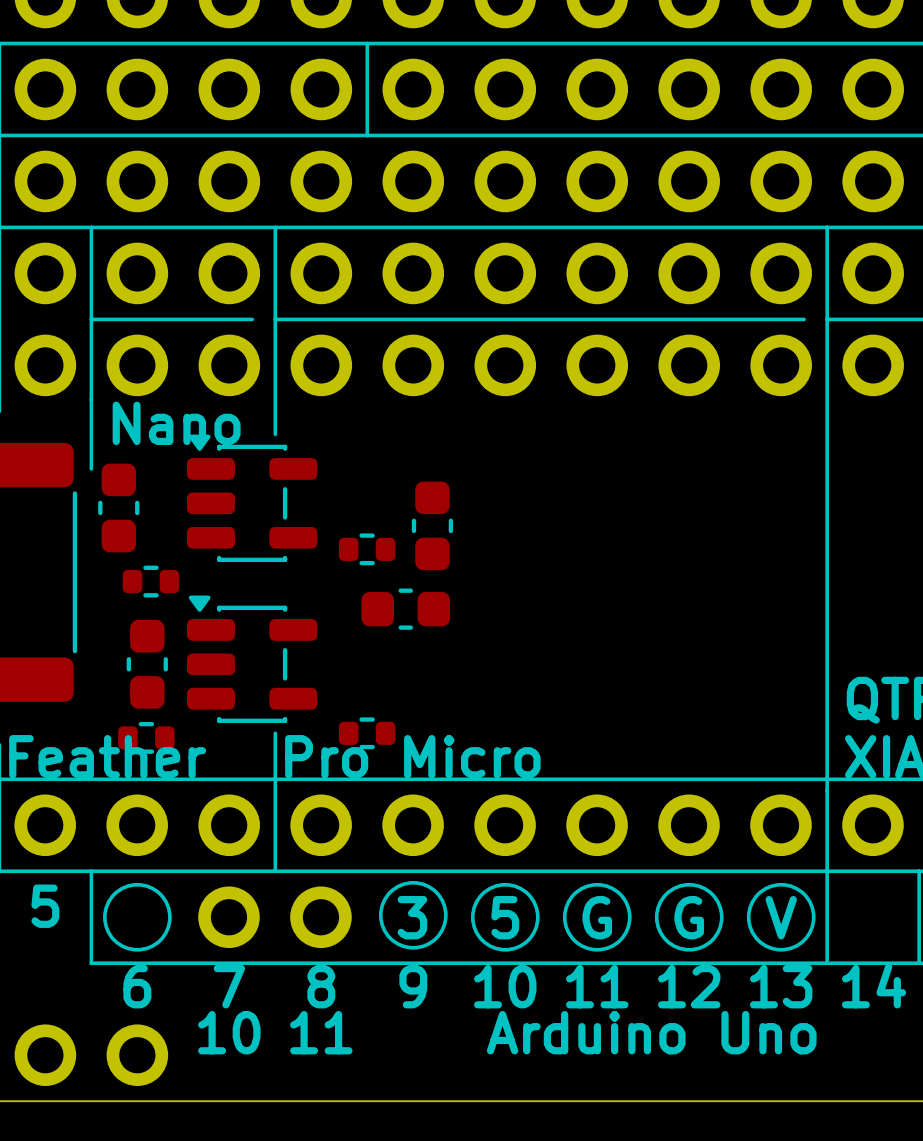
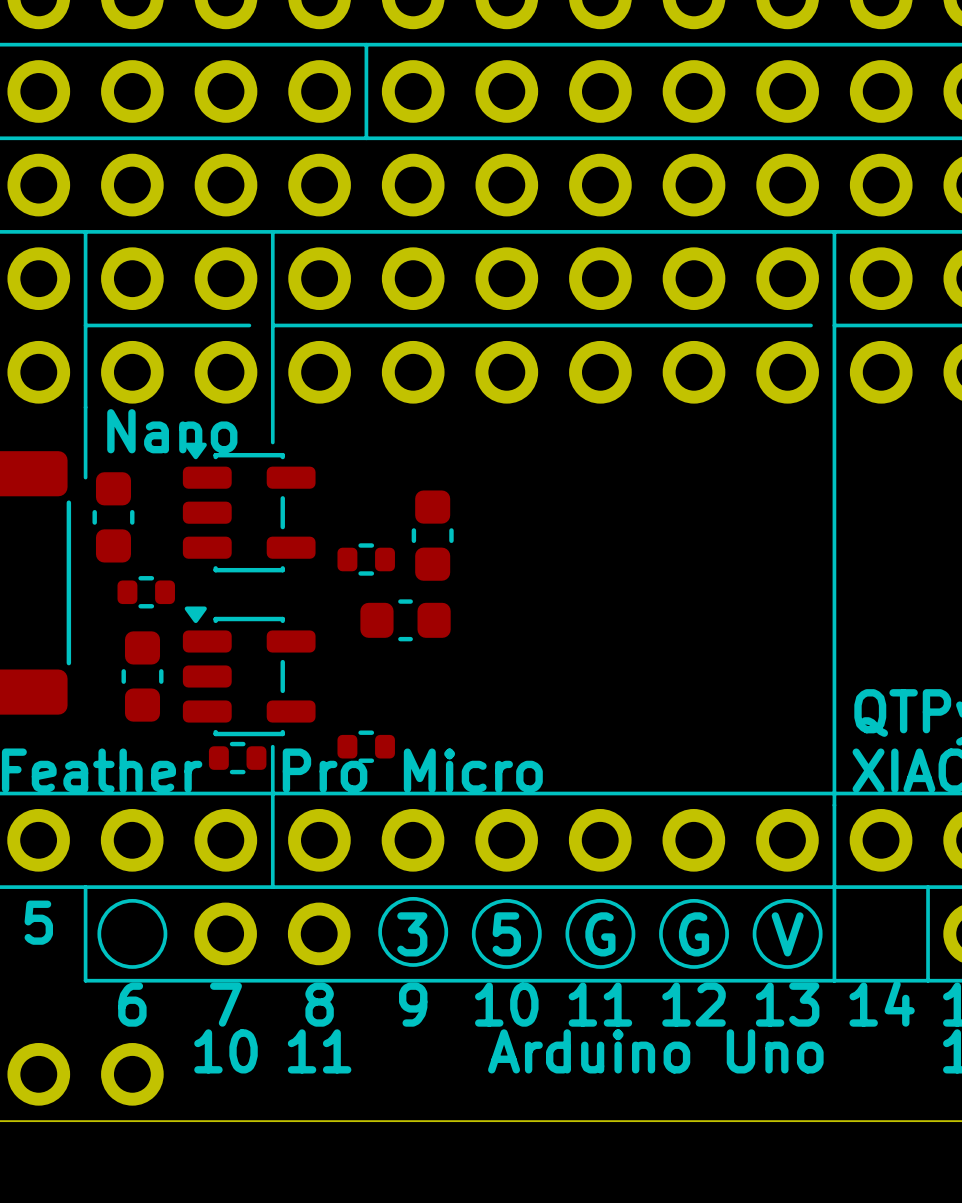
part position: (146, 737) -> (237, 758)

